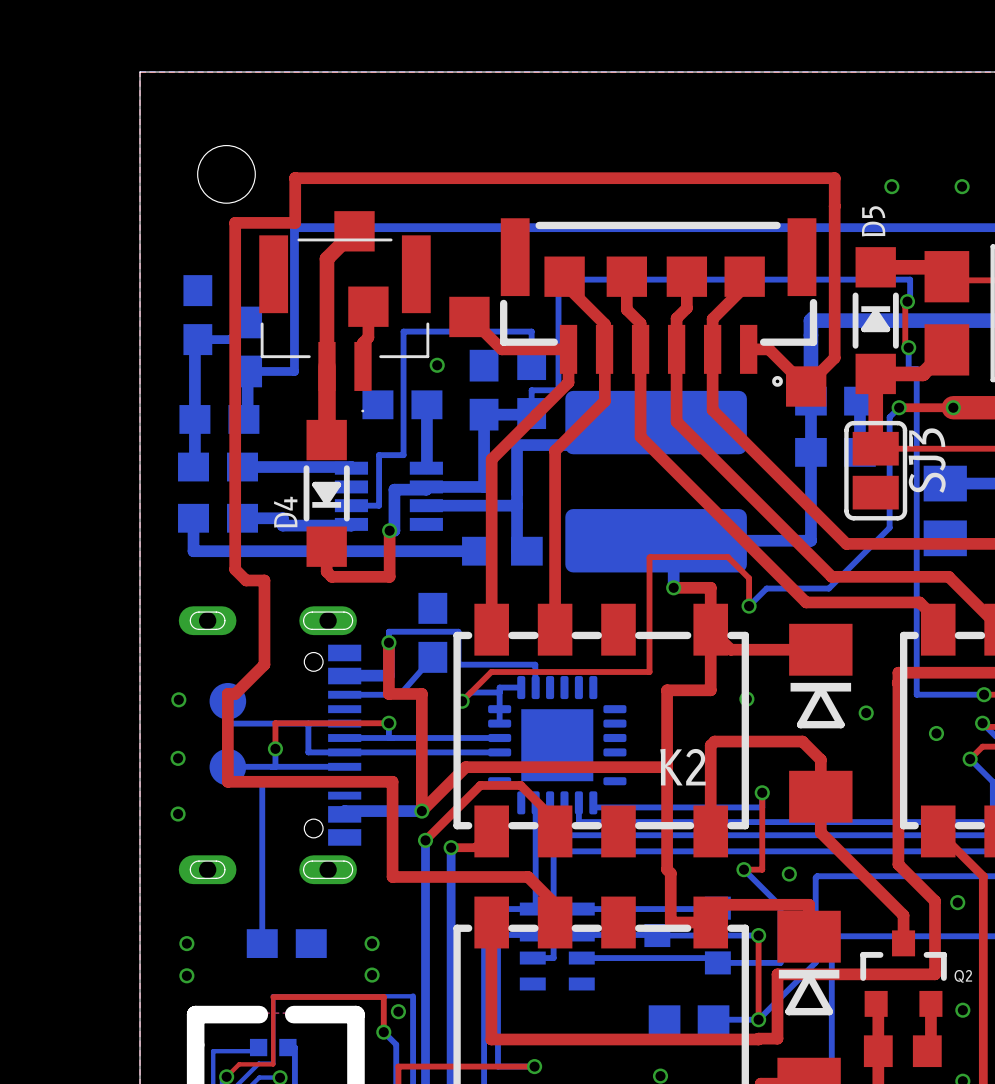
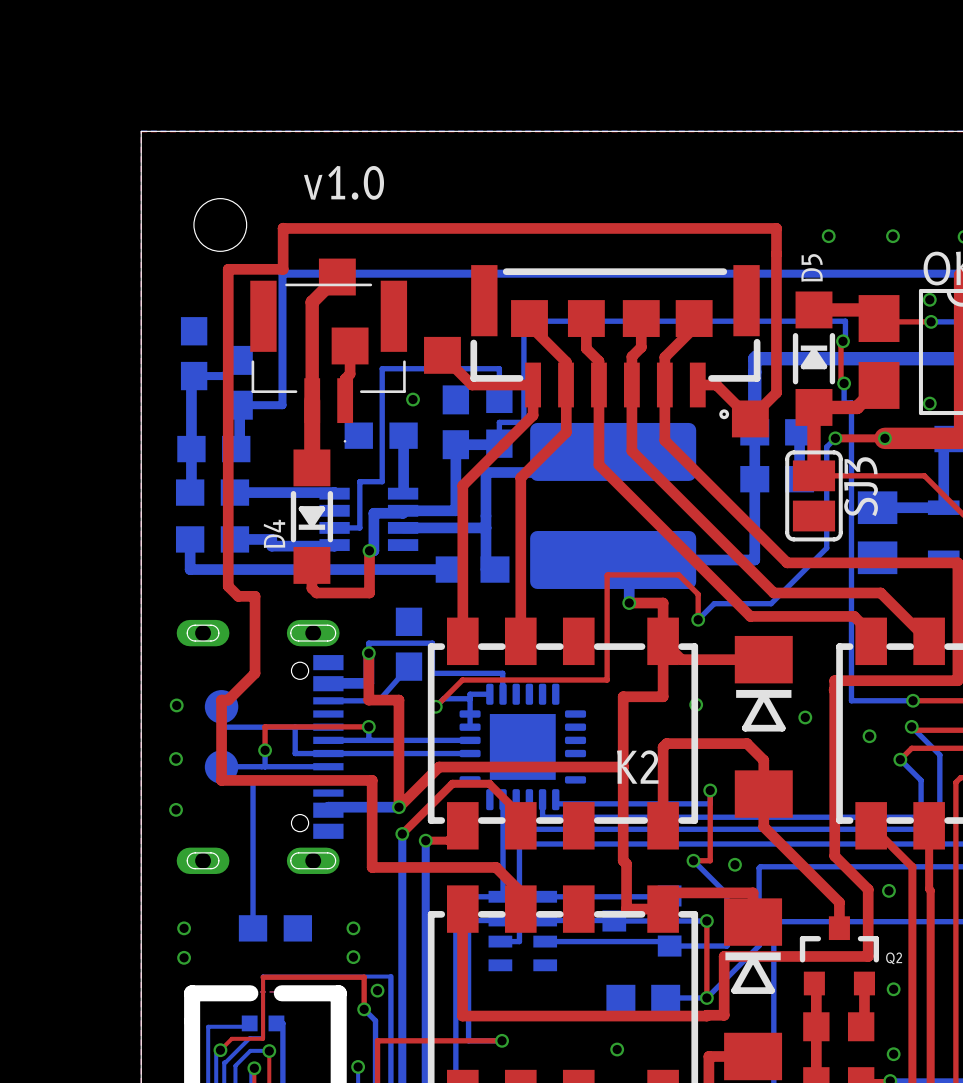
text: none -> v1.0 (343, 182)

